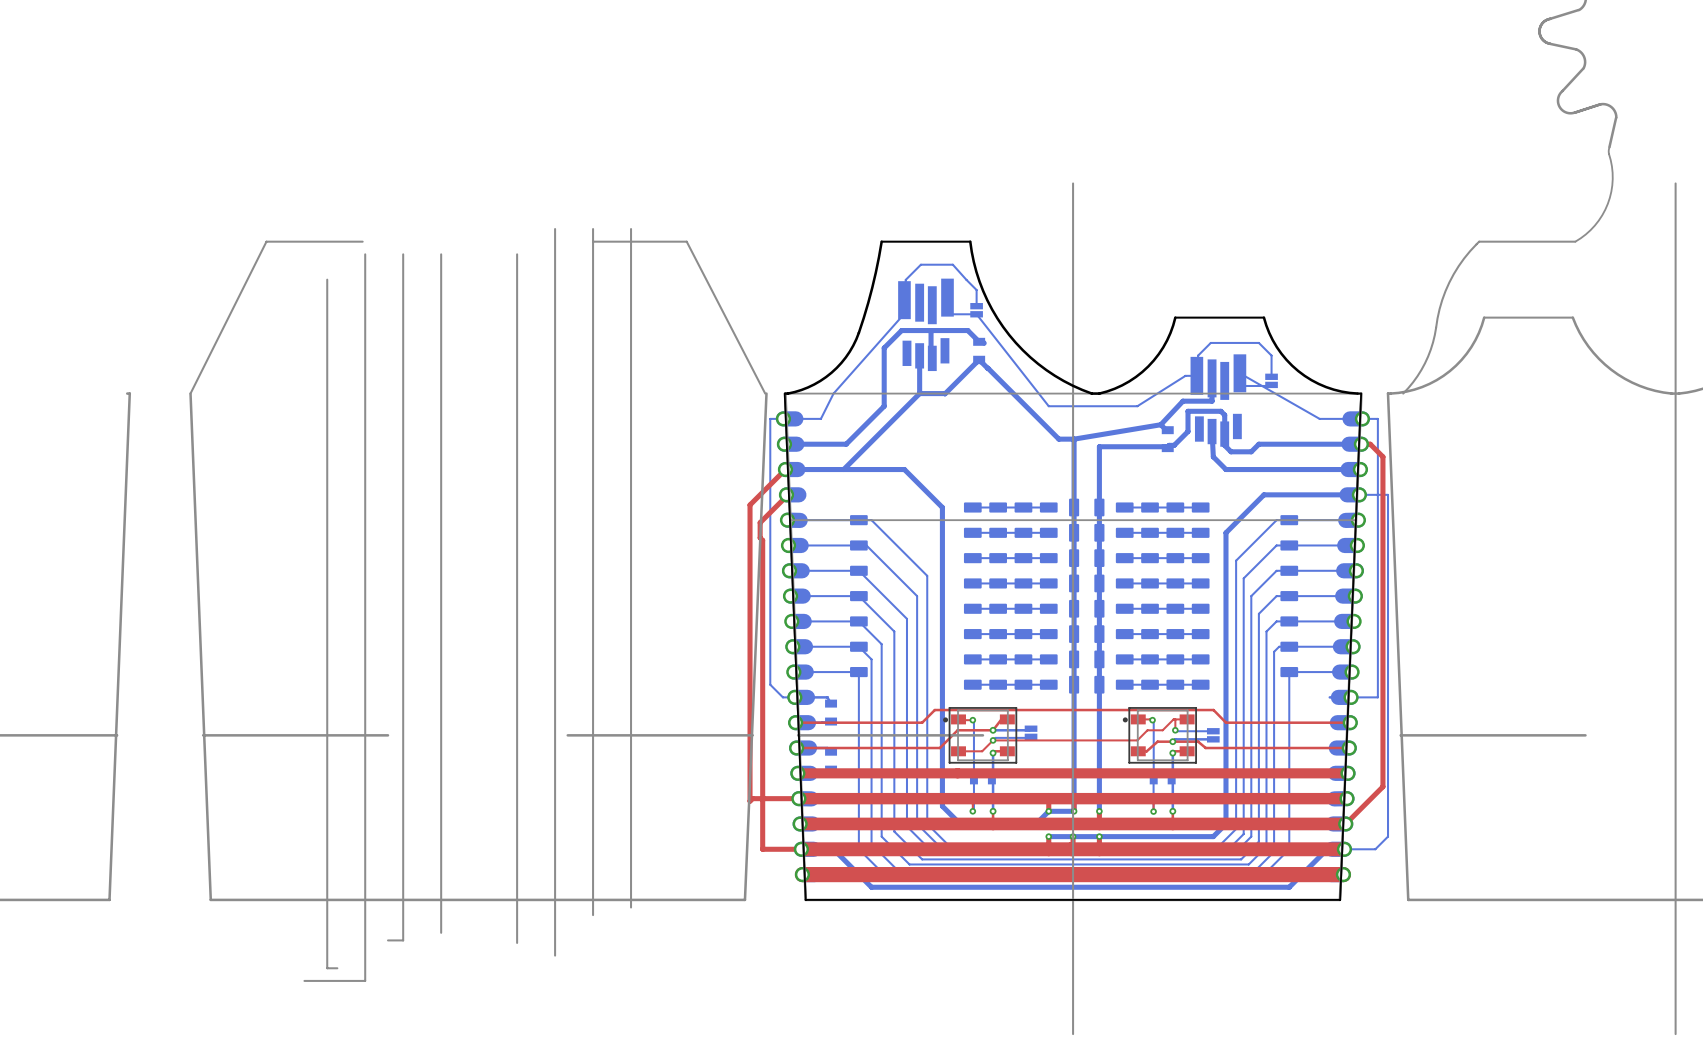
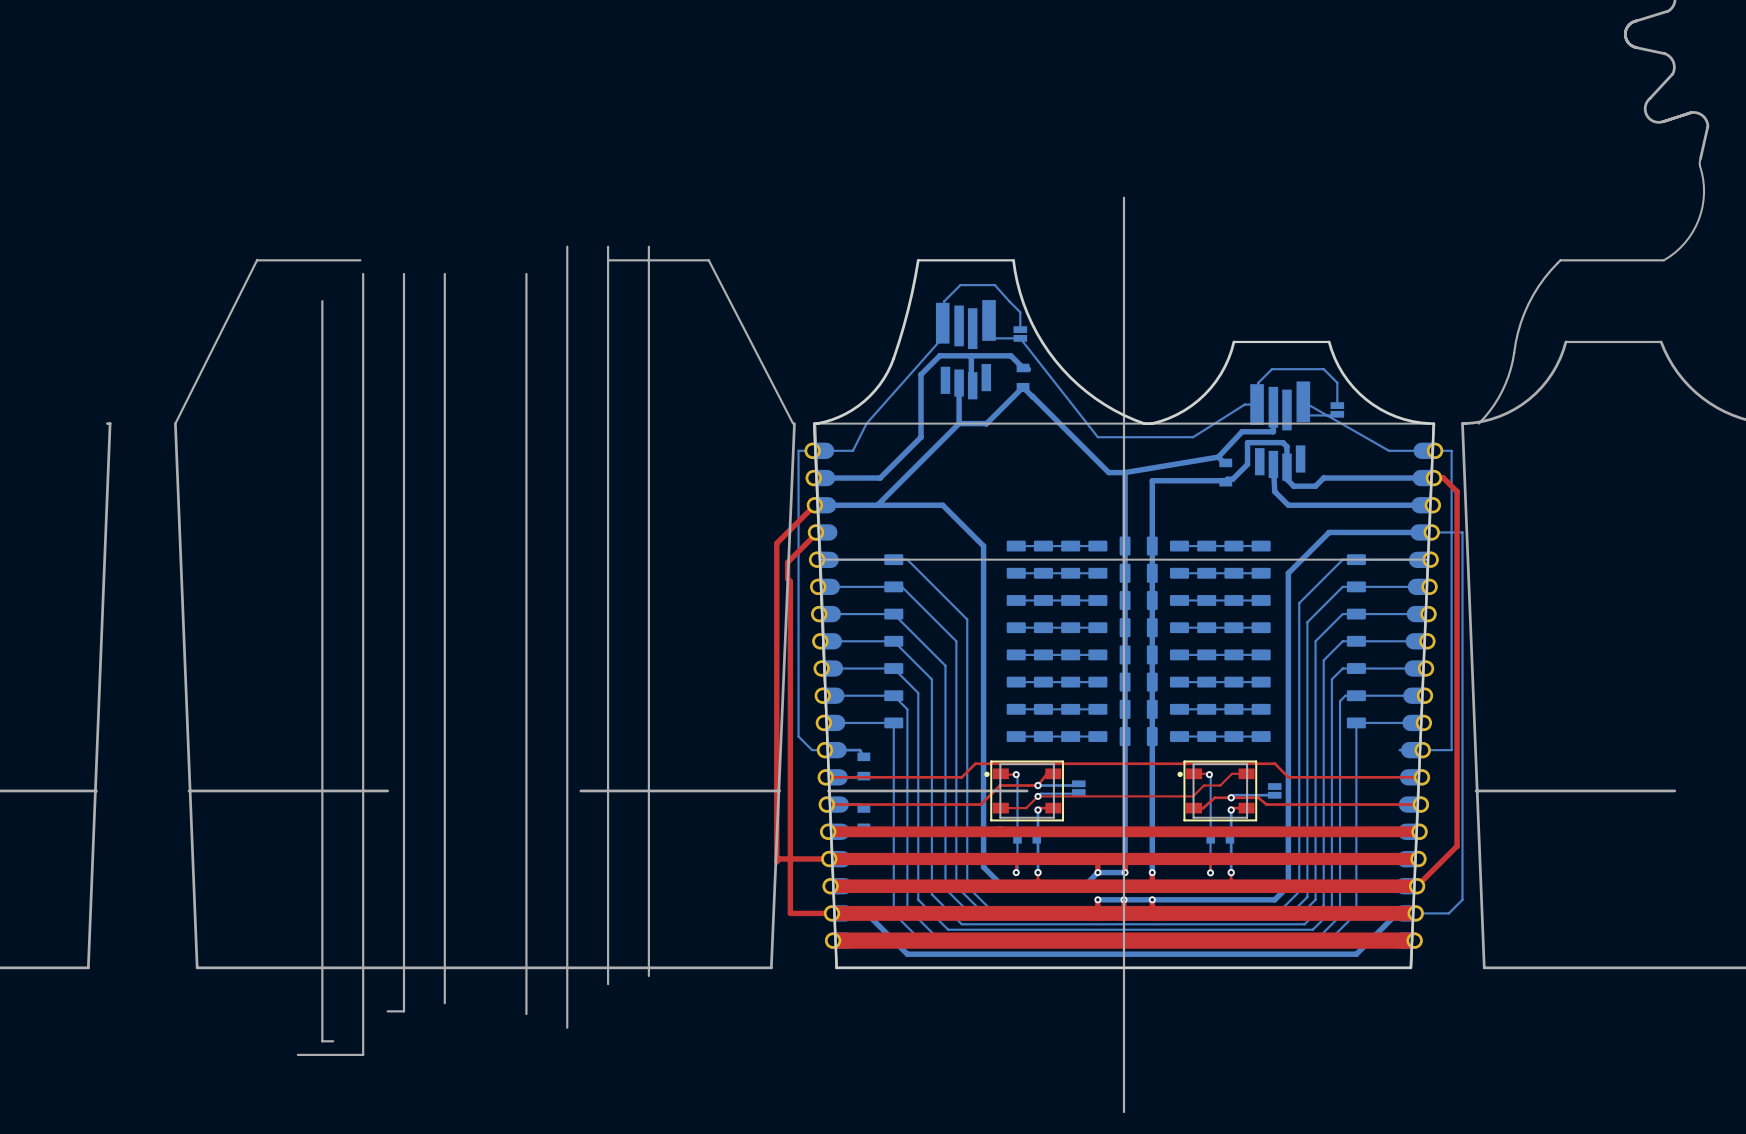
top track: (1175, 719) (1175, 730) -> none
bottom track: (1175, 730) (1213, 731) -> none
via: (1175, 730) -> none

